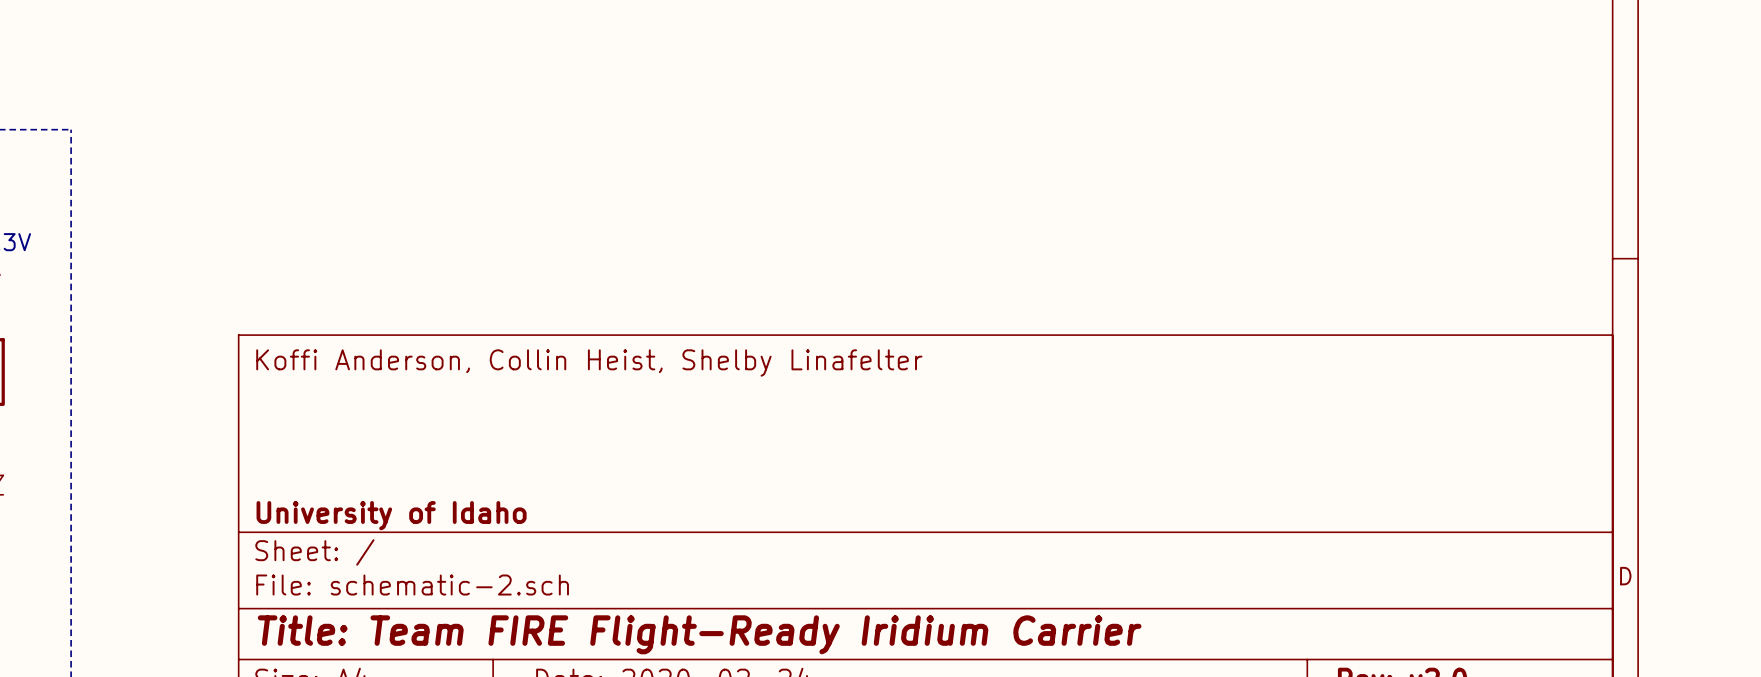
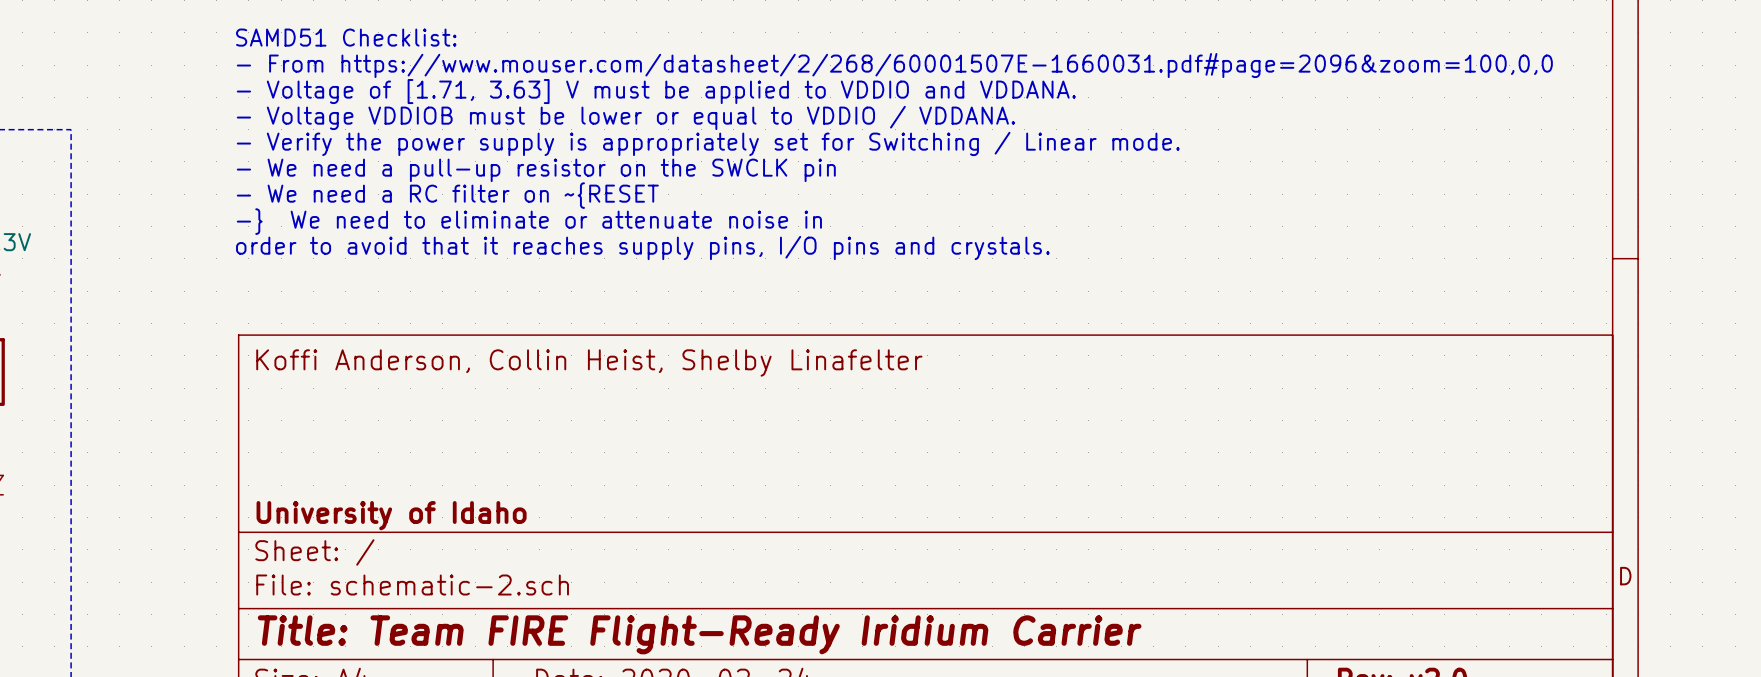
text: none -> SAMD51 Checklist: (346, 37)
text: none -> - From https://www.mouser.com/datasheet/2/268/60001507E-1660031.pdf#page=2096&zoom=100,0,0 (894, 65)
text: none -> - Voltage of [1.71, 3.63] V must be applied to VDDIO and VDDANA. (656, 91)
text: none -> - Voltage VDDIOB must be lower or equal to VDDIO / VDDANA. (625, 117)
text: none -> - Verify the power supply is appropriately set for Switching / Linear mode. (708, 143)
text: none -> - We need a pull-up resistor on the SWCLK pin (536, 170)
text: none -> - We need a RC filter on ~{RESET (447, 195)
text: none -> -} We need to eliminate or attenuate noise in (529, 221)
text: none -> order to avoid that it reaches supply pins, I/O pins and crystals. (642, 248)

